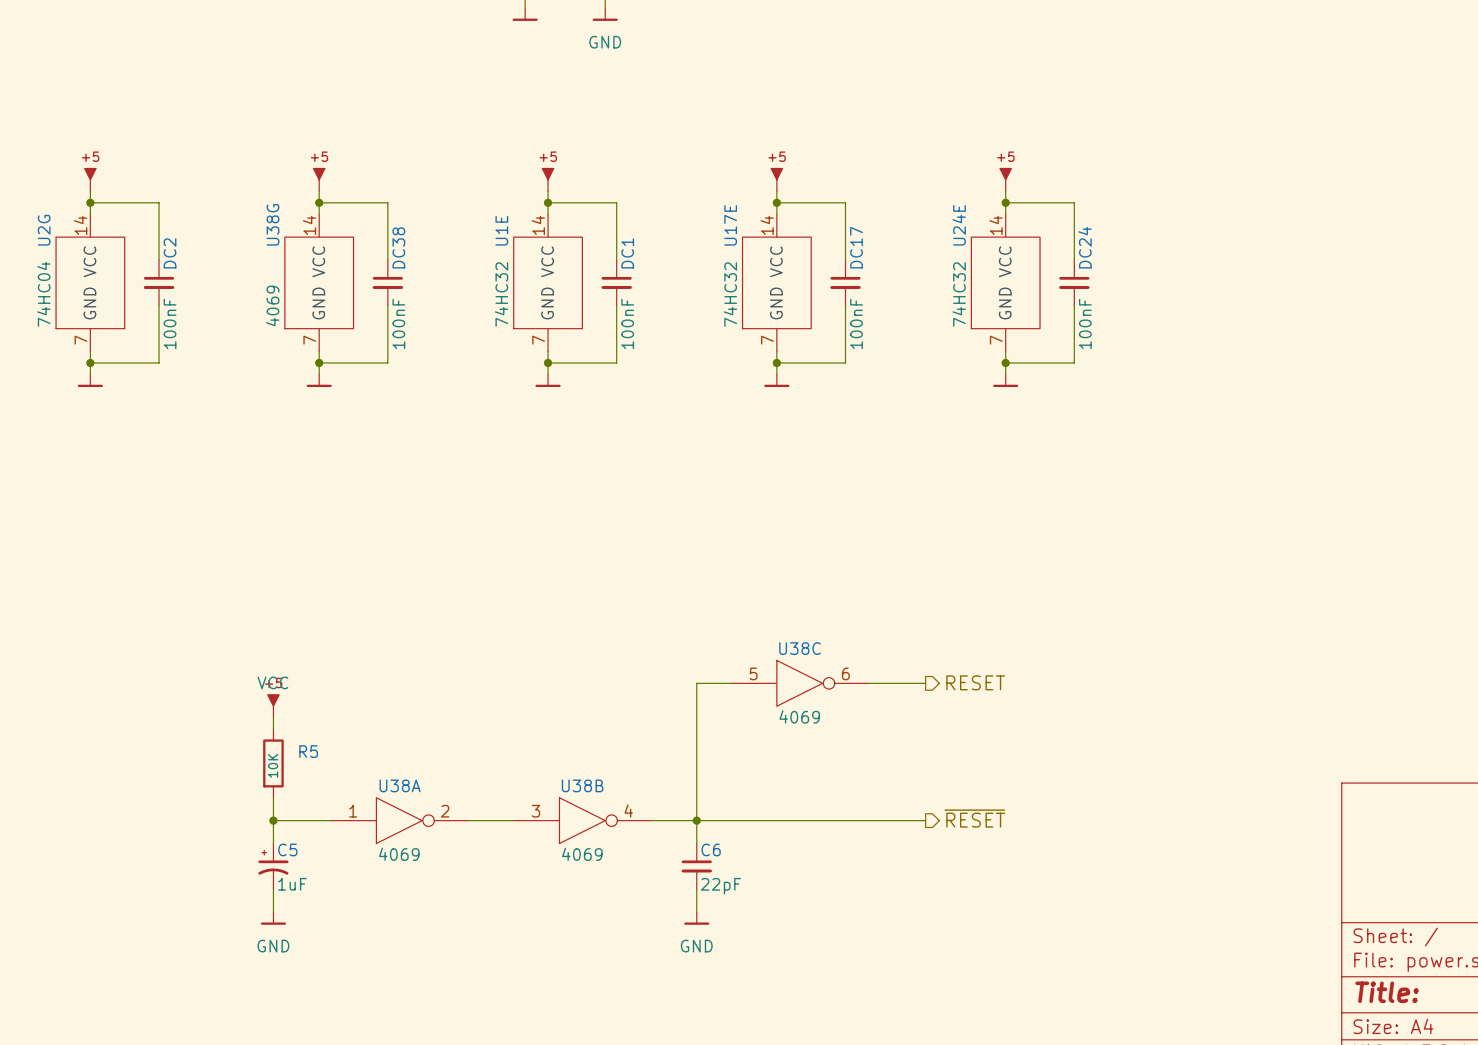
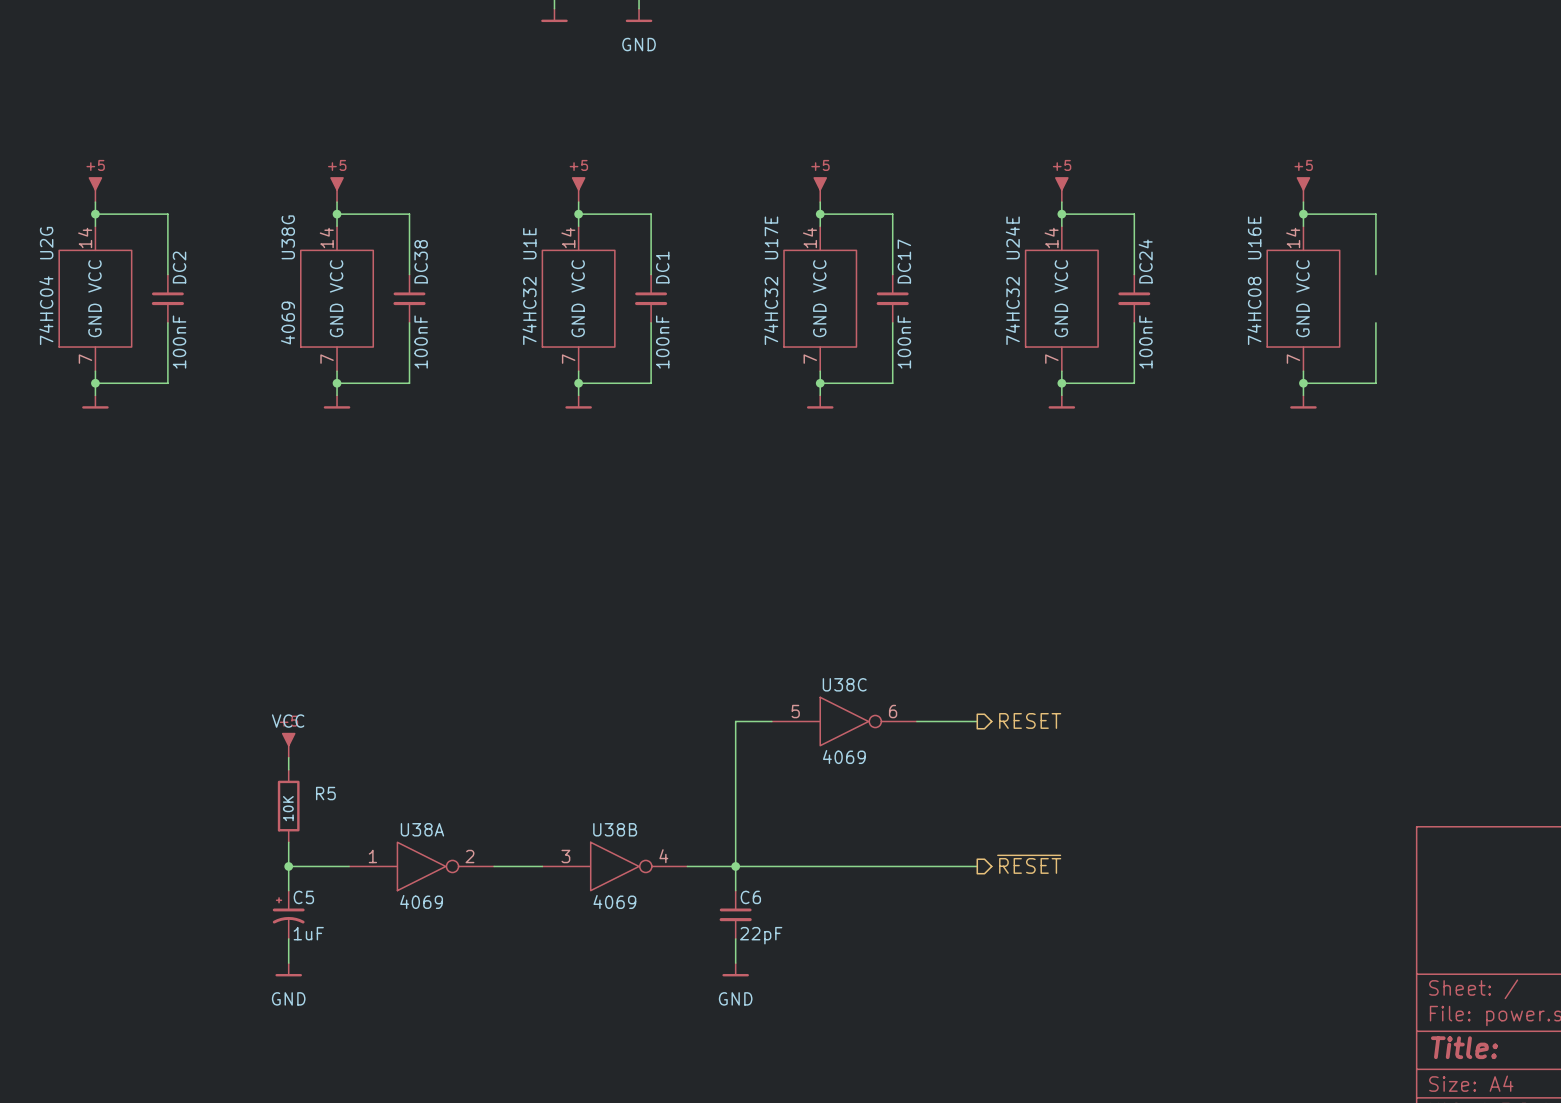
power symbol: none -> (1303, 189)
wire: none -> (1303, 202) (1303, 226)
wire: none -> (1303, 214) (1375, 214) (1375, 274)
junction: none -> (1303, 214)
U16E: none -> 74HC08 (1303, 298)
wire: none -> (1375, 322) (1375, 383) (1303, 383)
wire: none -> (1303, 371) (1303, 395)
junction: none -> (1303, 383)
power symbol: none -> (1303, 401)

